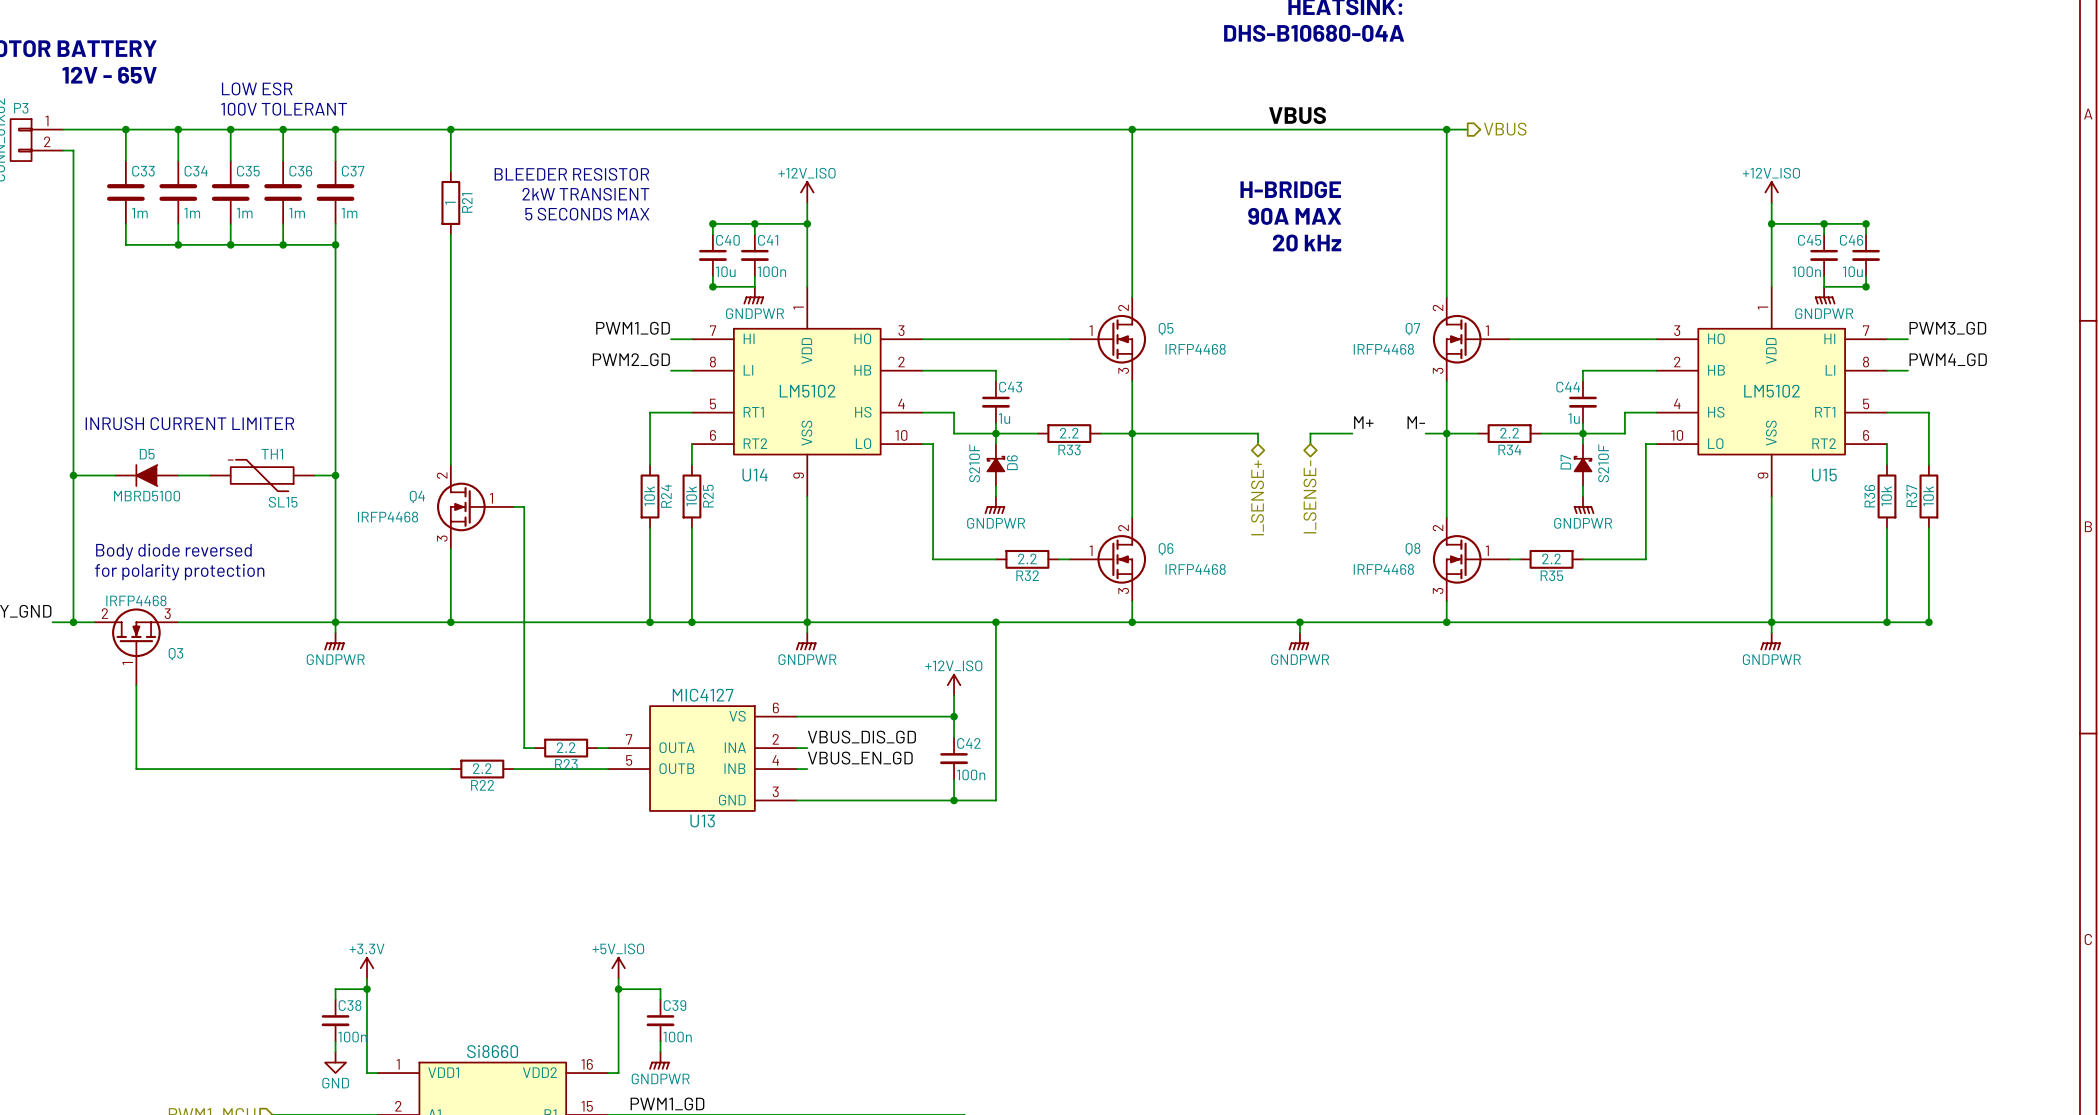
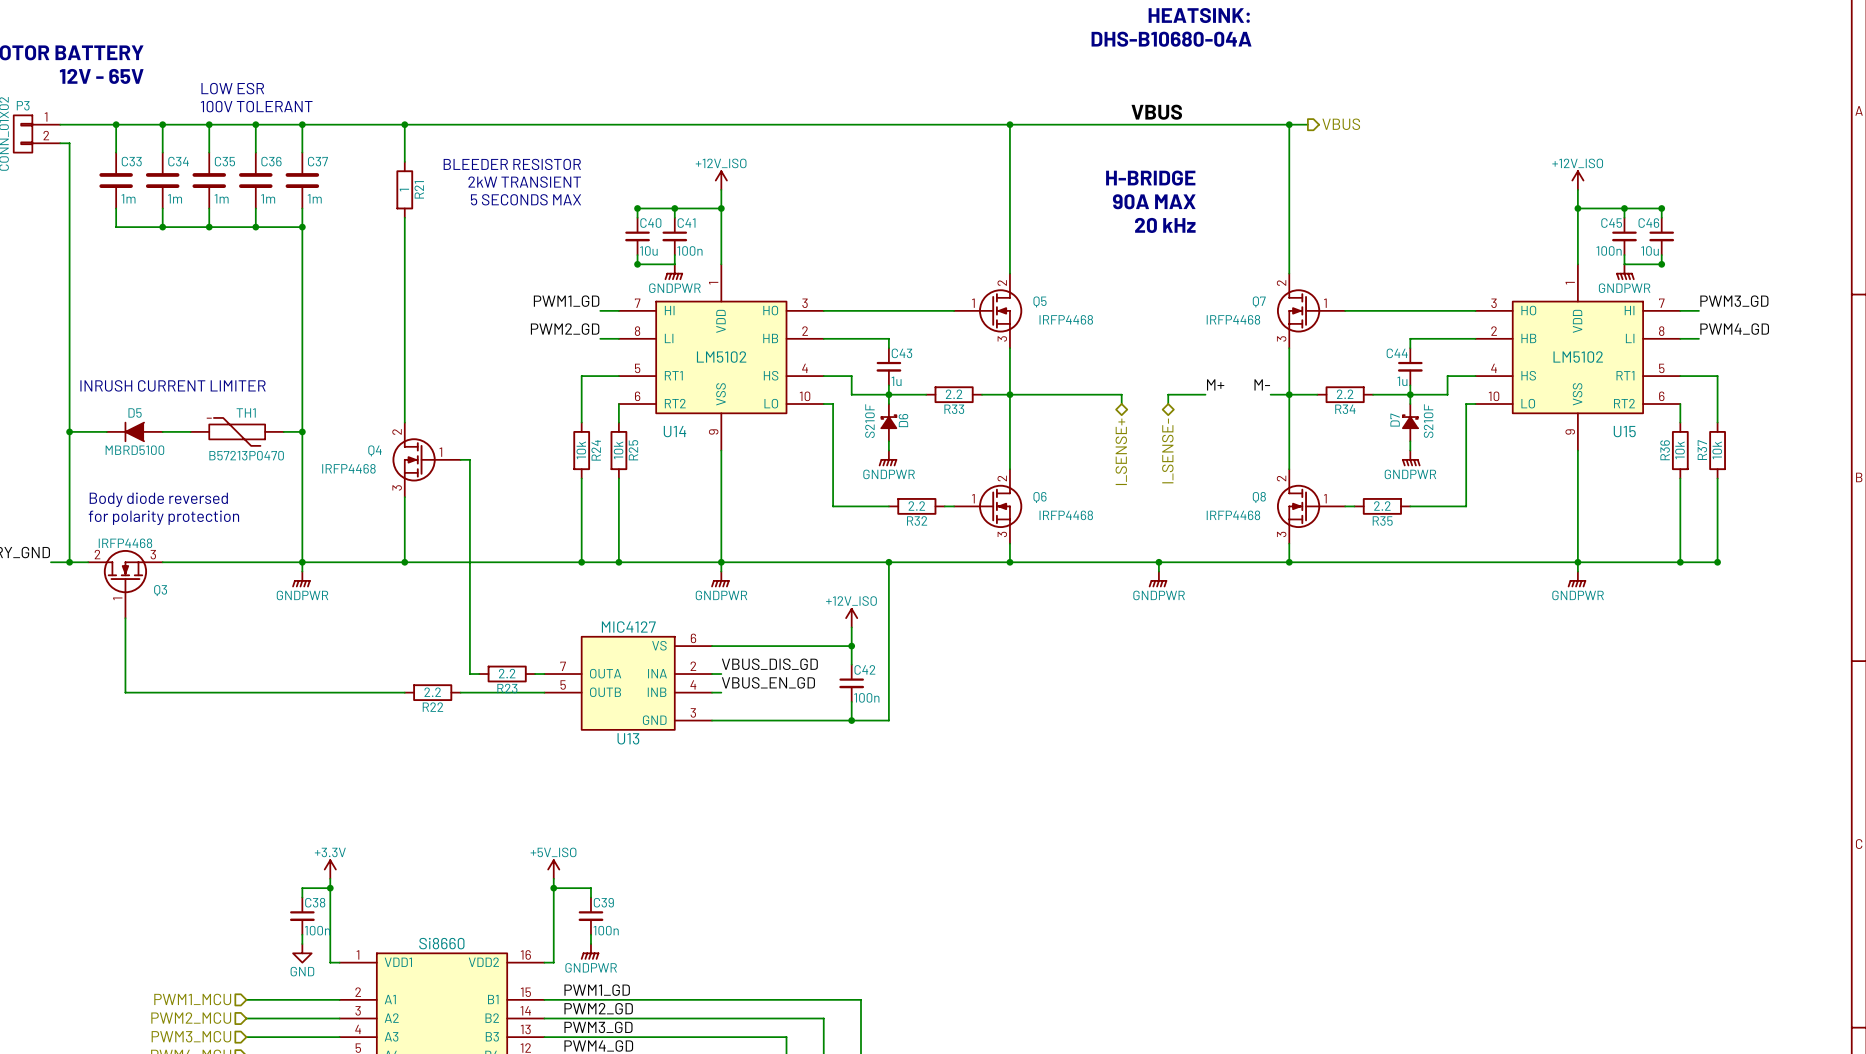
TH1 value: SL15 (283, 502) -> B57213P0470 (246, 455)

